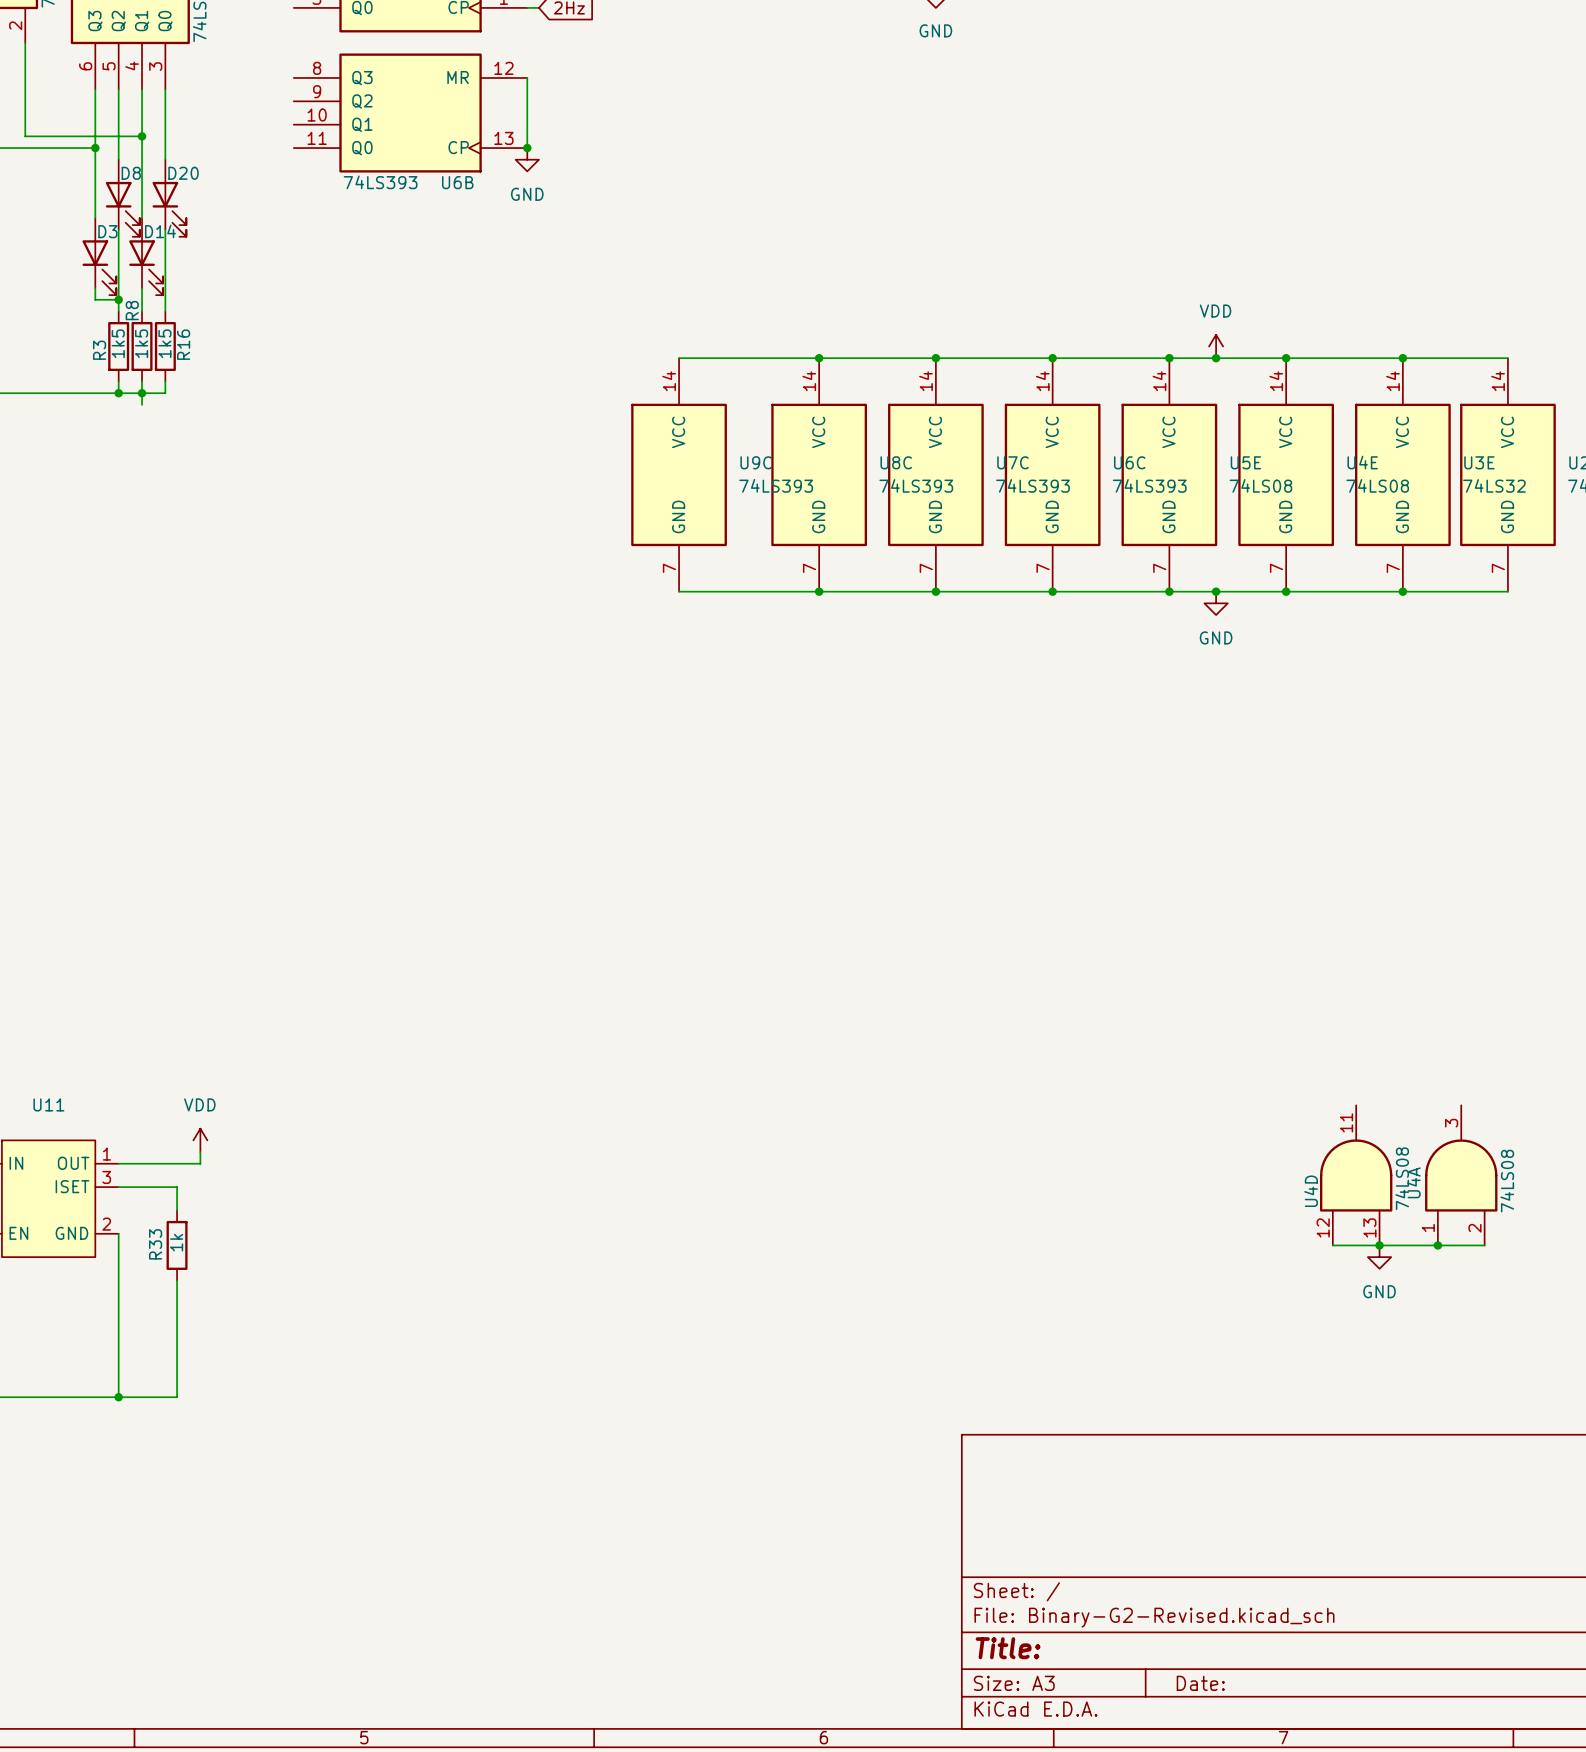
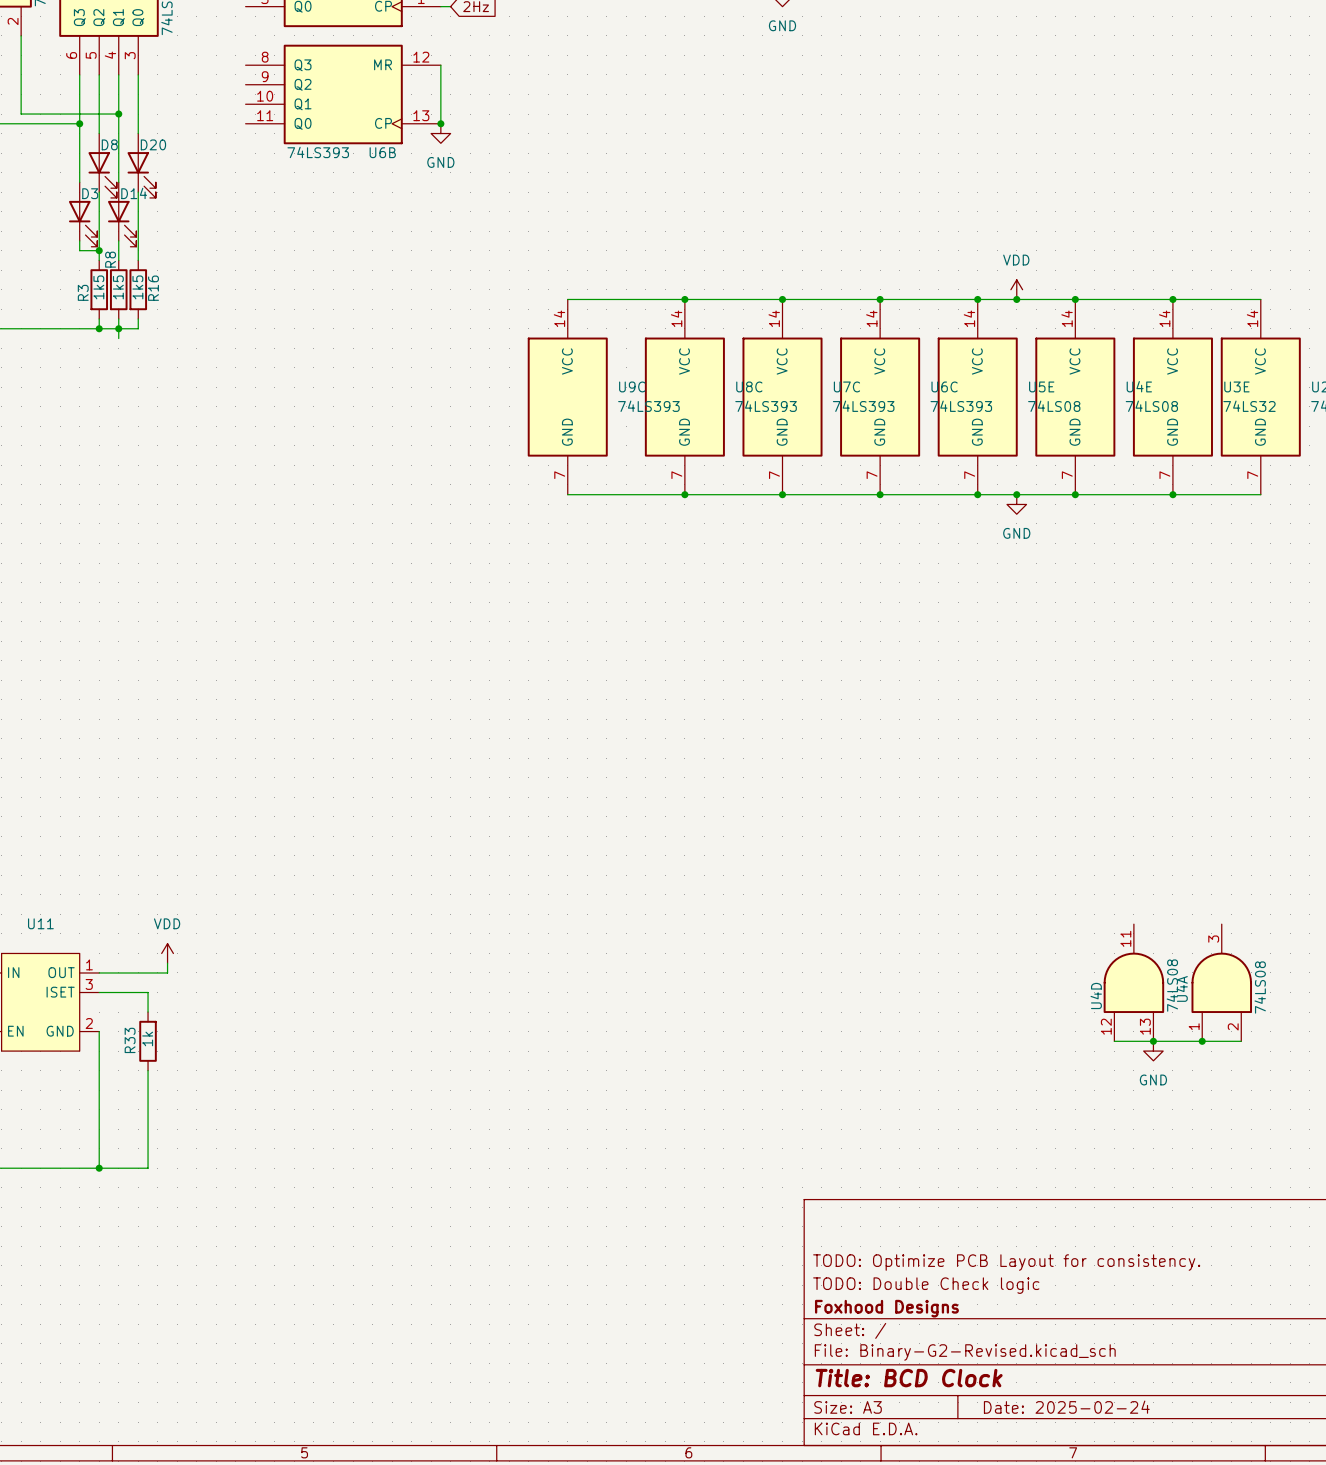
title block: none -> TODO: Optimize PCB Layout for consistency. (1006, 1262)
title block: none -> TODO: Double Check logic (926, 1285)
title block: none -> Foxhood Designs (886, 1308)
title block: Title: (1008, 1648) -> Title: BCD Clock (909, 1378)
title block: Date: (1200, 1683) -> Date: 2025-02-24 (1066, 1407)

